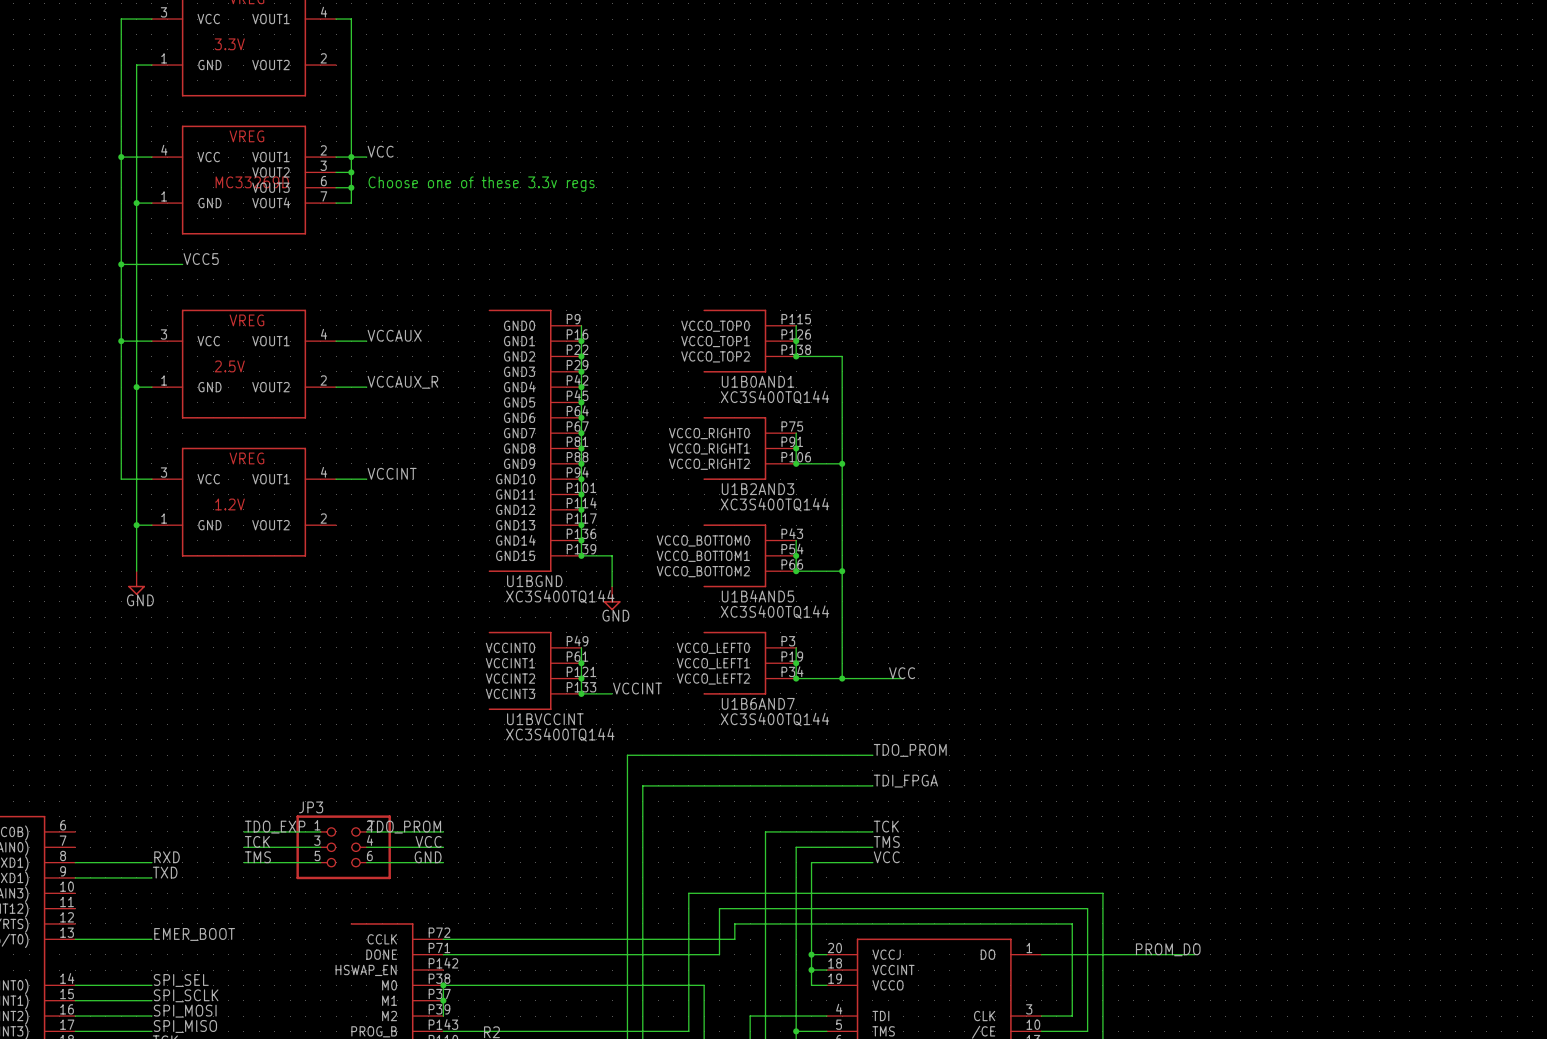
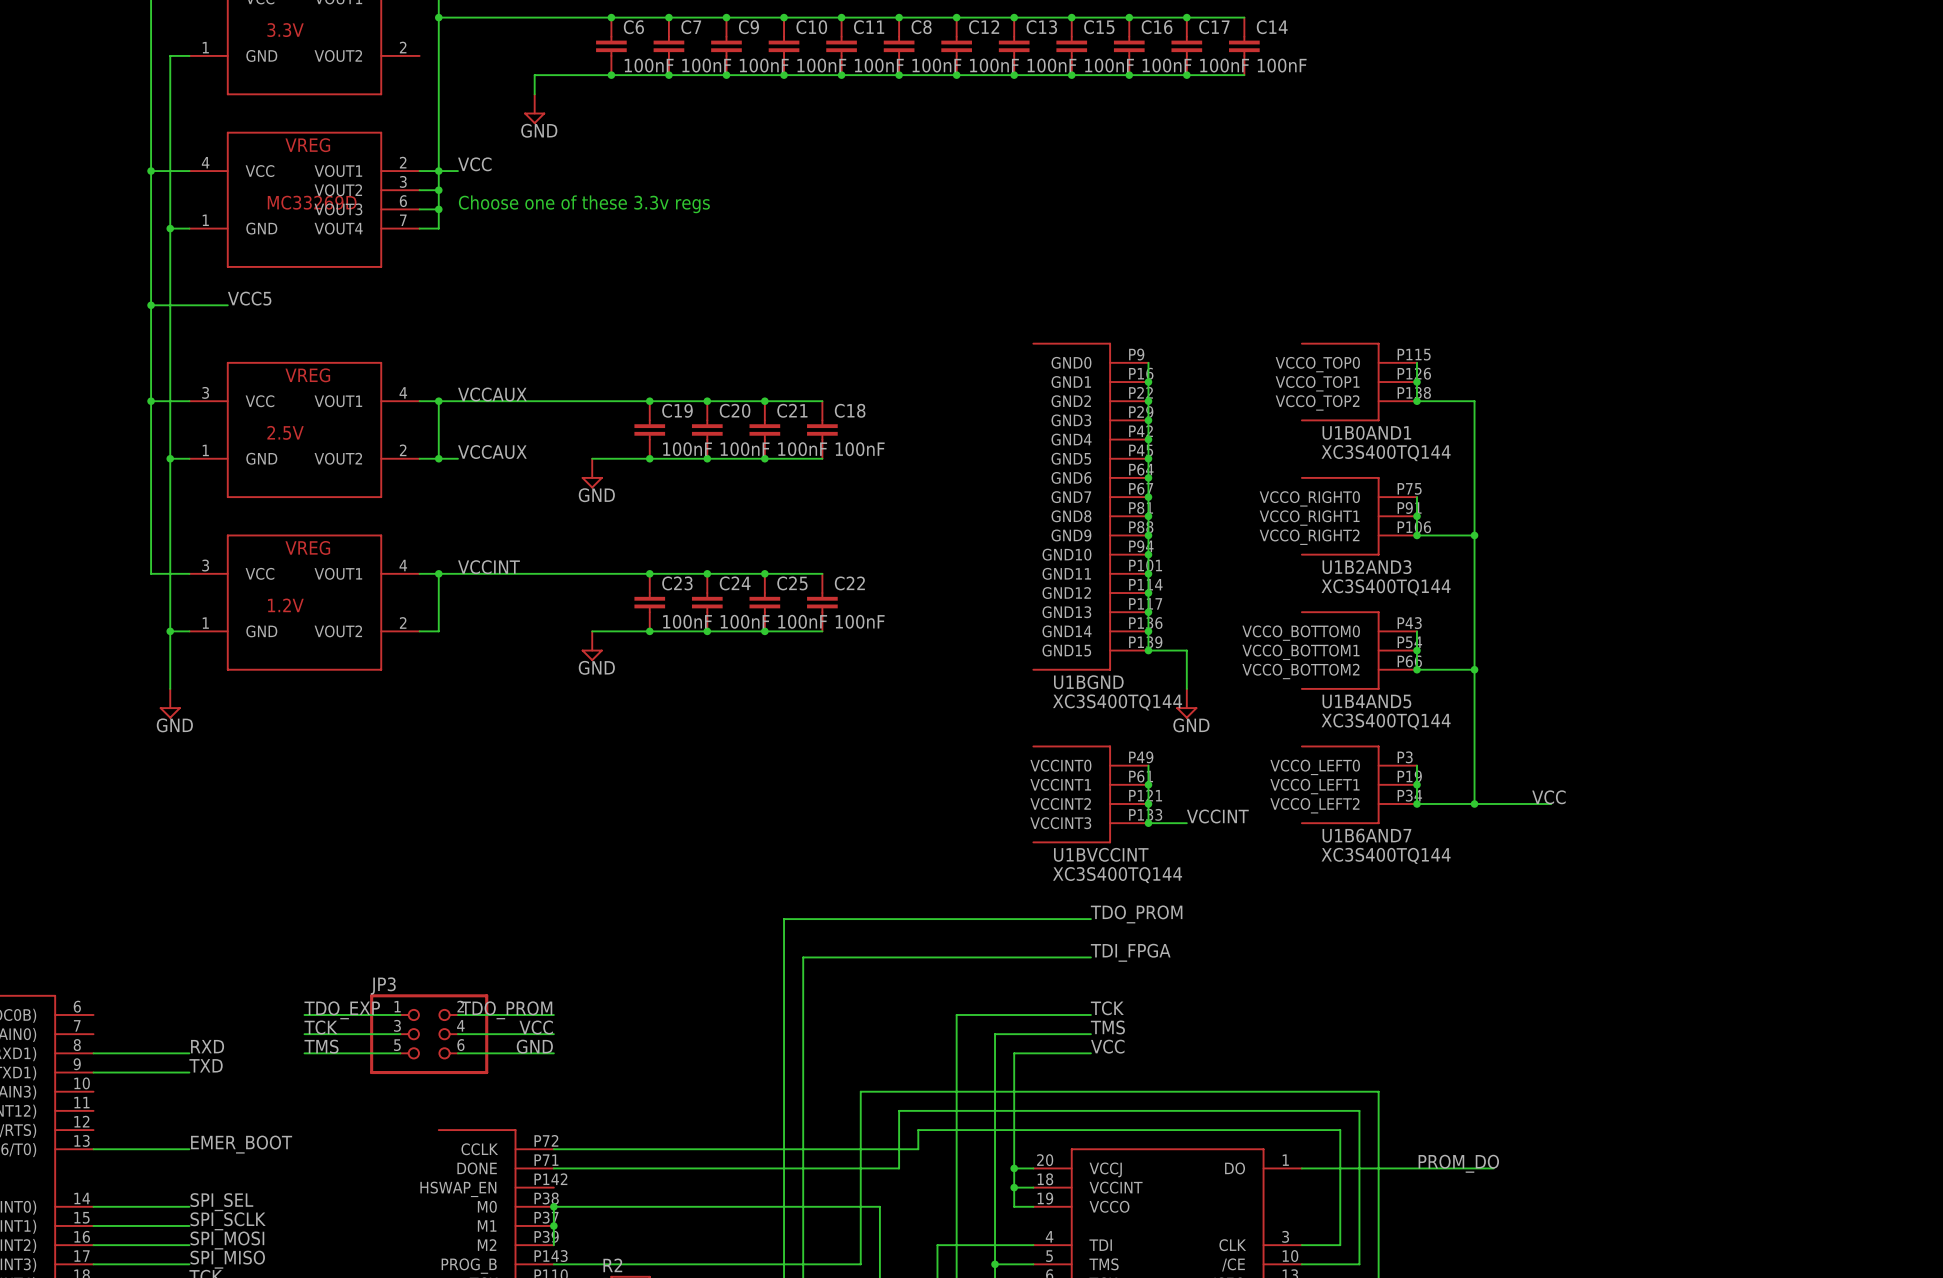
wire: none -> (438, 17) (1244, 17)
junction: none -> (438, 17)
junction: none -> (611, 17)
junction: none -> (668, 17)
junction: none -> (726, 17)
junction: none -> (784, 17)
junction: none -> (841, 17)
junction: none -> (899, 17)
junction: none -> (956, 17)
junction: none -> (1014, 17)
junction: none -> (1071, 17)
junction: none -> (1129, 17)
junction: none -> (1186, 17)
C6: none -> 100nF (611, 46)
C7: none -> 100nF (668, 46)
C9: none -> 100nF (726, 46)
C10: none -> 100nF (784, 46)
C11: none -> 100nF (841, 46)
C8: none -> 100nF (899, 46)
C12: none -> 100nF (956, 46)
C13: none -> 100nF (1014, 46)
C15: none -> 100nF (1071, 46)
C16: none -> 100nF (1129, 46)
C17: none -> 100nF (1186, 46)
C14: none -> 100nF (1244, 46)
junction: none -> (611, 75)
junction: none -> (668, 75)
junction: none -> (726, 75)
junction: none -> (784, 75)
junction: none -> (841, 75)
junction: none -> (899, 75)
junction: none -> (956, 75)
junction: none -> (1014, 75)
junction: none -> (1071, 75)
junction: none -> (1129, 75)
junction: none -> (1186, 75)
wire: none -> (1244, 75) (534, 75) (534, 94)
power symbol: none -> GND (534, 109)
wire: none -> (1148, 362) (1148, 650) (1186, 650) (1186, 688)
wire: none -> (1416, 362) (1416, 401) (1474, 401) (1474, 804)
wire: (581, 325) (581, 555) (612, 555) (612, 586) -> none
wire: (796, 325) (796, 356) (842, 356) (842, 678) -> none
junction: none -> (1148, 382)
junction: none -> (1416, 382)
wire: none -> (438, 401) (438, 458)
junction: none -> (438, 401)
wire: none -> (457, 401) (822, 401)
junction: none -> (649, 401)
junction: none -> (707, 401)
junction: (581, 341) -> none
junction: none -> (764, 401)
U1B0AND1 position: (749, 341) -> (1358, 382)
junction: (796, 341) -> none
junction: none -> (1148, 401)
junction: none -> (1416, 401)
junction: (581, 356) -> none
junction: (796, 356) -> none
junction: none -> (1148, 420)
C19: none -> 100nF (649, 429)
C20: none -> 100nF (707, 429)
C21: none -> 100nF (764, 429)
C18: none -> 100nF (822, 429)
junction: (581, 371) -> none
junction: none -> (1148, 439)
label: VCCAUX_R (402, 382) -> VCCAUX (492, 452)
junction: none -> (438, 458)
wire: none -> (592, 458) (822, 458)
junction: none -> (649, 458)
junction: none -> (707, 458)
junction: (581, 387) -> none
junction: none -> (764, 458)
junction: none -> (1148, 458)
power symbol: none -> GND (592, 473)
junction: (581, 402) -> none
junction: none -> (1148, 477)
junction: (581, 417) -> none
junction: none -> (1148, 497)
wire: none -> (1416, 497) (1416, 535) (1474, 535)
junction: (581, 433) -> none
wire: (796, 433) (796, 463) (842, 463) -> none
junction: none -> (1148, 516)
junction: none -> (1416, 516)
U1BGND position: (535, 440) -> (1090, 506)
junction: (581, 448) -> none
U1B2AND3 position: (749, 448) -> (1358, 516)
junction: (796, 448) -> none
junction: none -> (1148, 535)
junction: none -> (1416, 535)
junction: none -> (1474, 535)
junction: (581, 463) -> none
junction: (796, 463) -> none
junction: (842, 463) -> none
junction: none -> (1148, 554)
wire: none -> (438, 573) (438, 631) (419, 631)
junction: none -> (438, 573)
wire: none -> (457, 573) (822, 573)
junction: none -> (649, 573)
junction: none -> (707, 573)
junction: (581, 479) -> none
junction: none -> (764, 573)
junction: none -> (1148, 573)
junction: (581, 494) -> none
junction: none -> (1148, 593)
C23: none -> 100nF (649, 602)
C24: none -> 100nF (707, 602)
C25: none -> 100nF (764, 602)
C22: none -> 100nF (822, 602)
junction: (581, 509) -> none
junction: none -> (1148, 612)
wire: none -> (592, 631) (822, 631)
junction: none -> (649, 631)
junction: none -> (707, 631)
junction: (581, 525) -> none
junction: none -> (764, 631)
junction: none -> (1148, 631)
wire: none -> (1416, 631) (1416, 669) (1474, 669)
power symbol: none -> GND (592, 646)
junction: (581, 540) -> none
wire: (796, 540) (796, 571) (842, 571) -> none
junction: none -> (1148, 650)
junction: none -> (1416, 650)
junction: (581, 555) -> none
U1B4AND5 position: (749, 555) -> (1358, 650)
junction: (796, 555) -> none
junction: none -> (1416, 669)
junction: none -> (1474, 669)
junction: (796, 571) -> none
junction: (842, 571) -> none
power symbol: none -> GND (1186, 703)
power symbol: GND (612, 598) -> none
wire: none -> (1148, 765) (1148, 823) (1186, 823)
wire: none -> (1416, 765) (1416, 804) (1551, 804)
wire: (581, 647) (581, 693) (612, 693) -> none
wire: (796, 647) (796, 678) (903, 678) -> none
junction: none -> (1148, 784)
junction: none -> (1416, 784)
label: none -> VCC (1548, 797)
junction: (581, 663) -> none
U1B6AND7 position: (749, 663) -> (1358, 784)
junction: (796, 663) -> none
junction: none -> (1148, 804)
junction: none -> (1416, 804)
junction: none -> (1474, 804)
U1BVCCINT position: (535, 670) -> (1090, 794)
label: VCC (902, 673) -> none
label: none -> VCCINT (1217, 816)
junction: (581, 678) -> none
junction: (796, 678) -> none
junction: (842, 678) -> none
junction: none -> (1148, 823)
label: VCCINT (637, 688) -> none
junction: (581, 693) -> none

